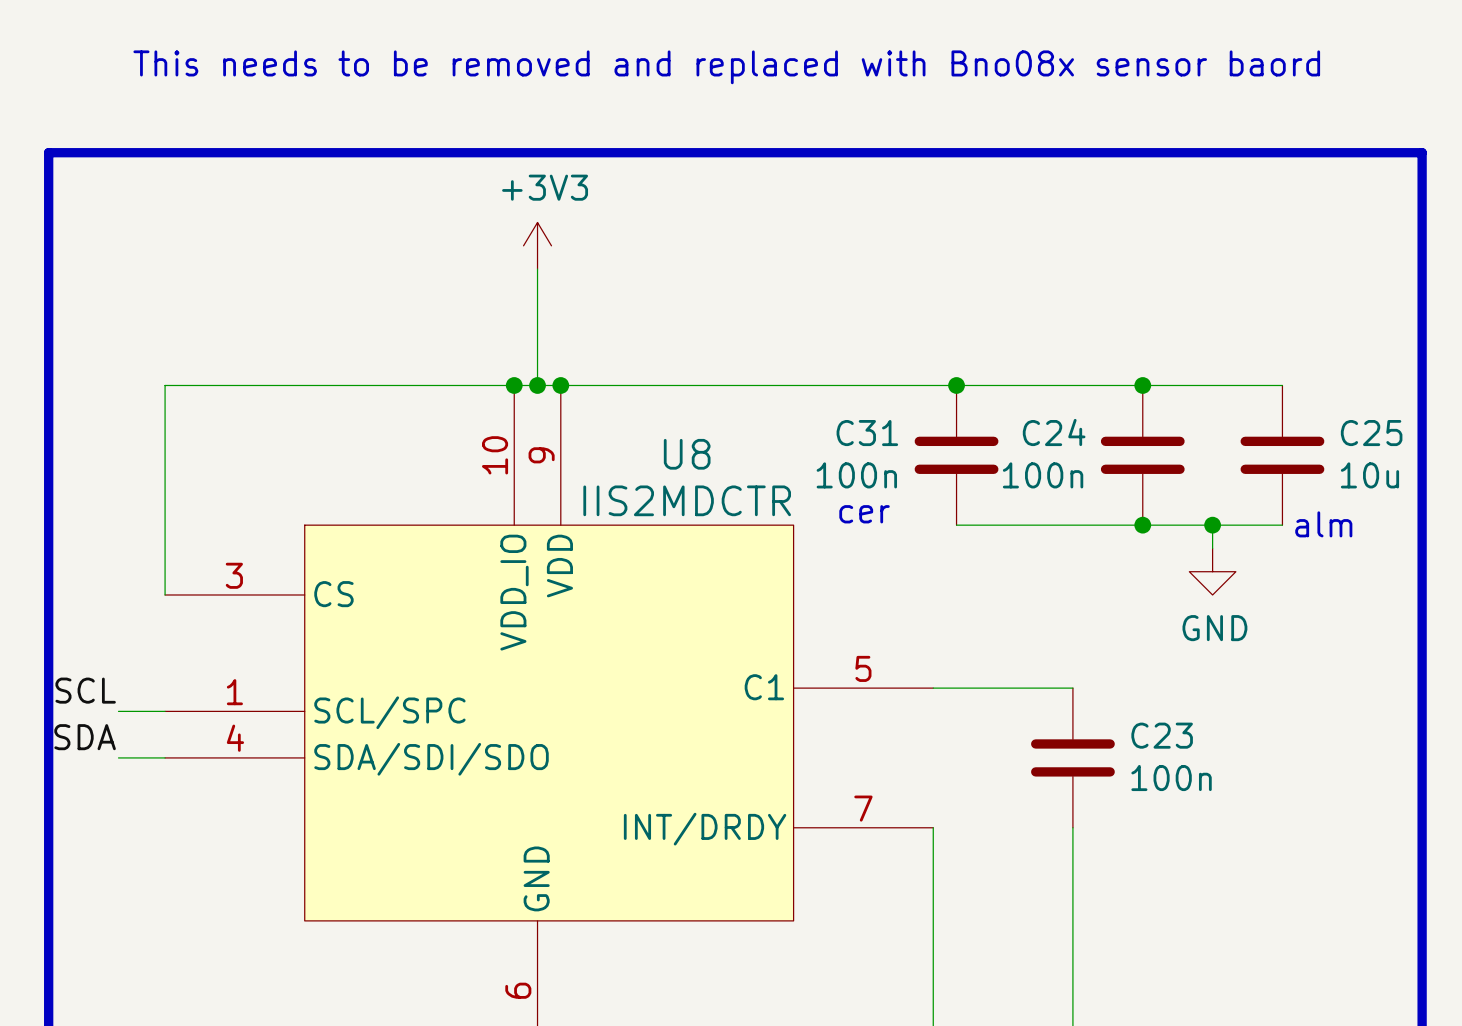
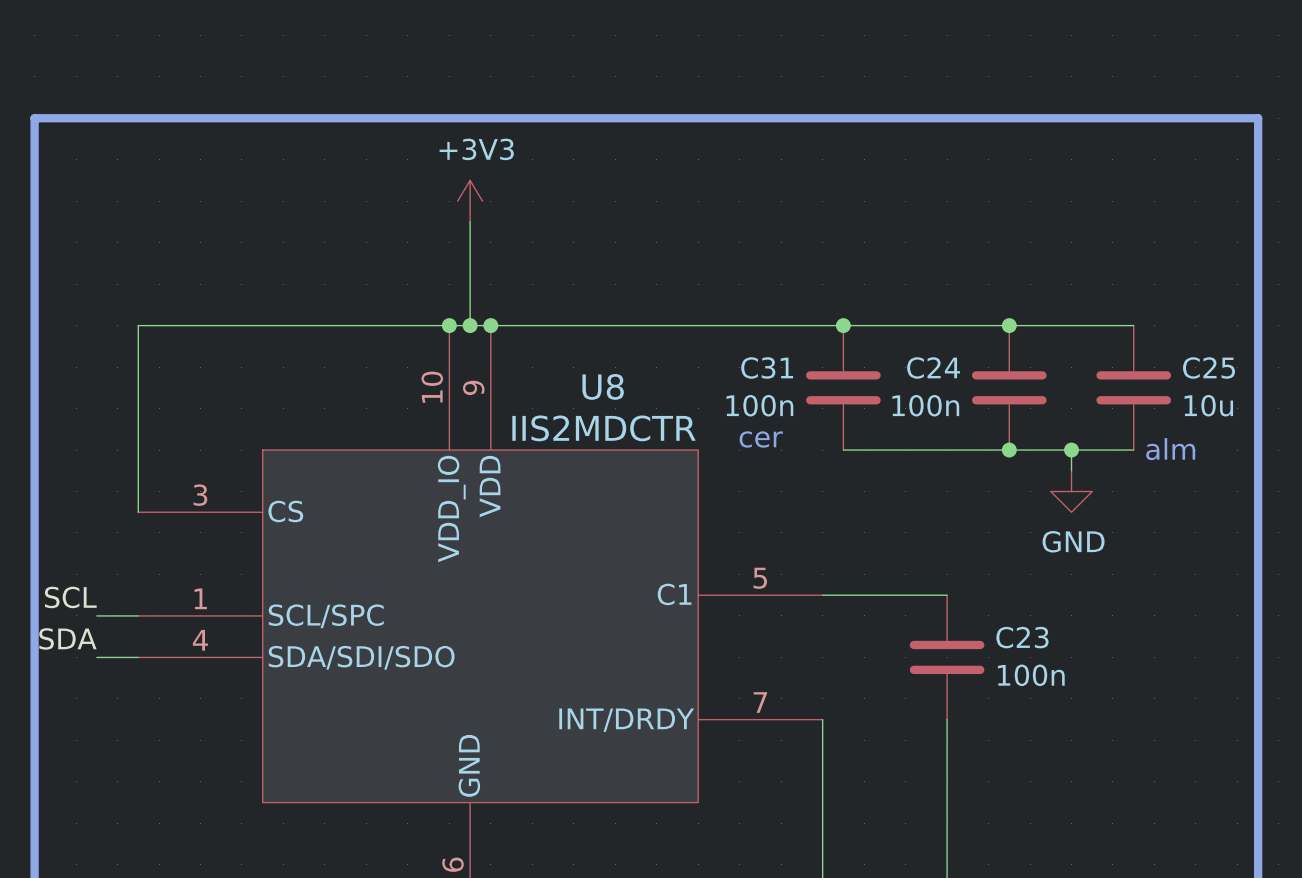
text: This needs to be removed and replaced with Bno08x sensor baord (726, 67) -> none

